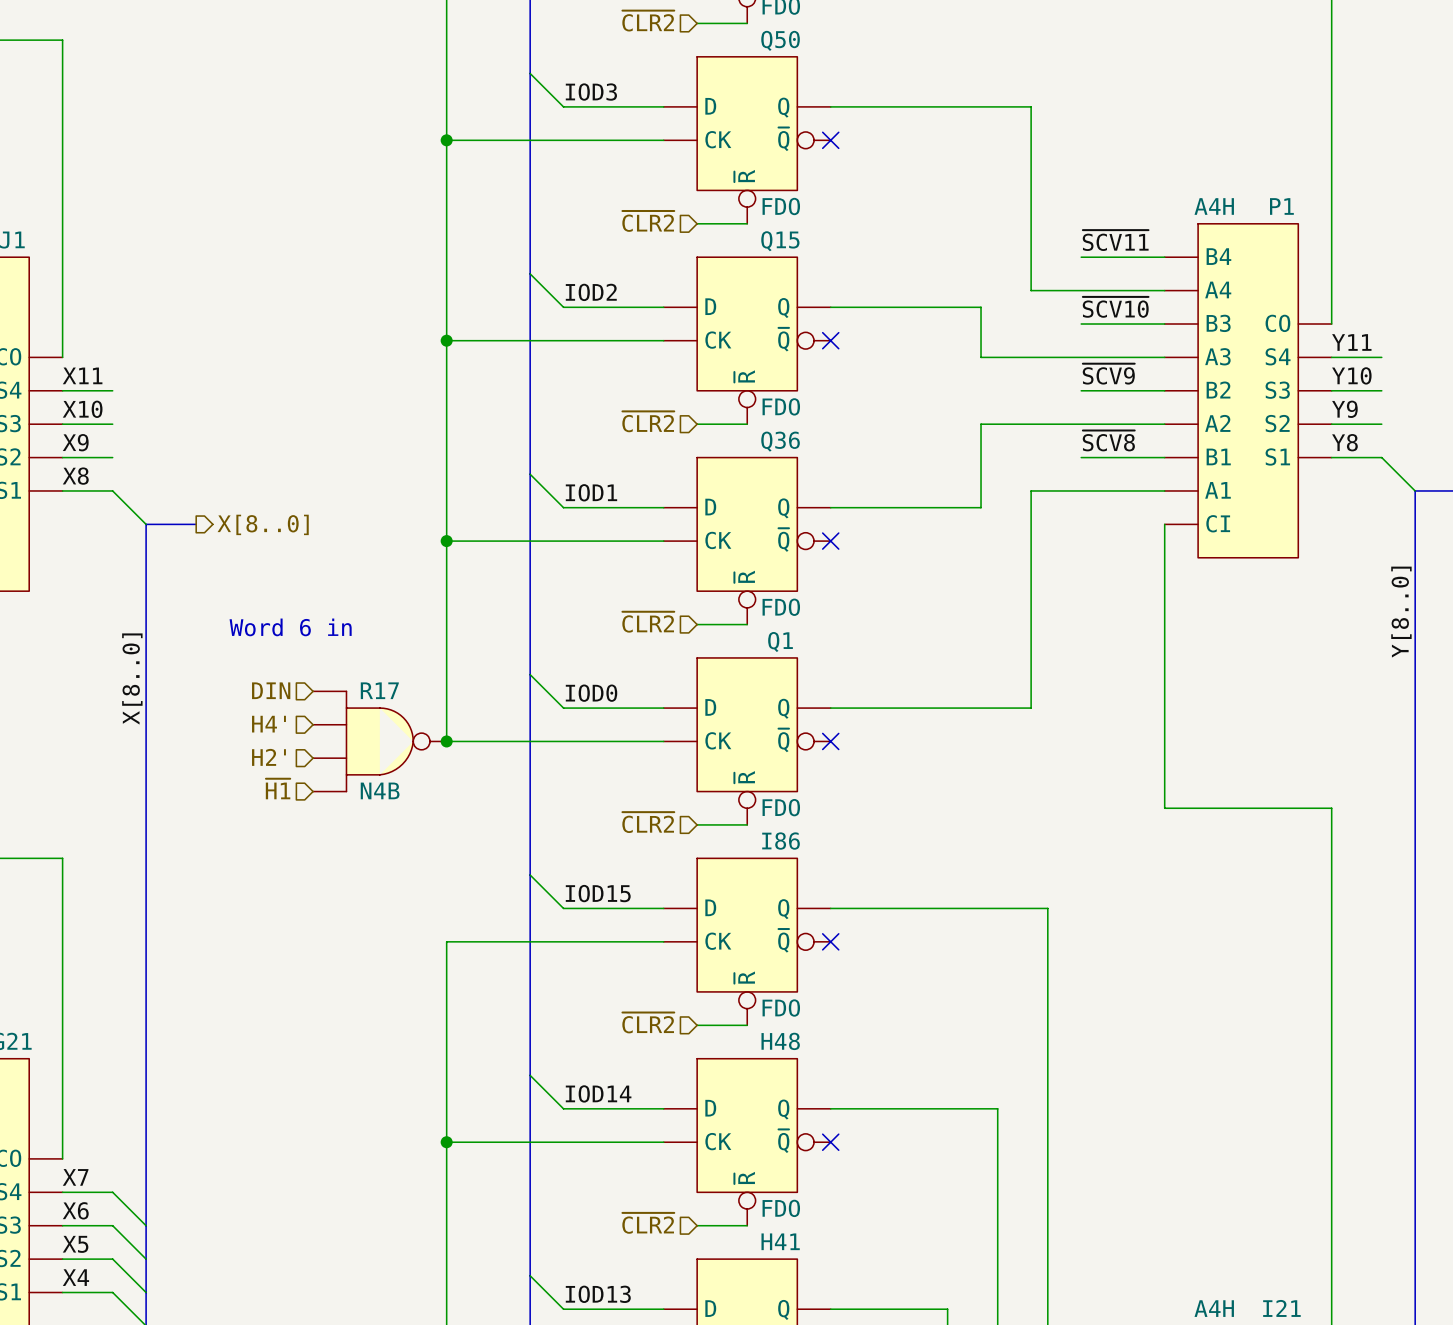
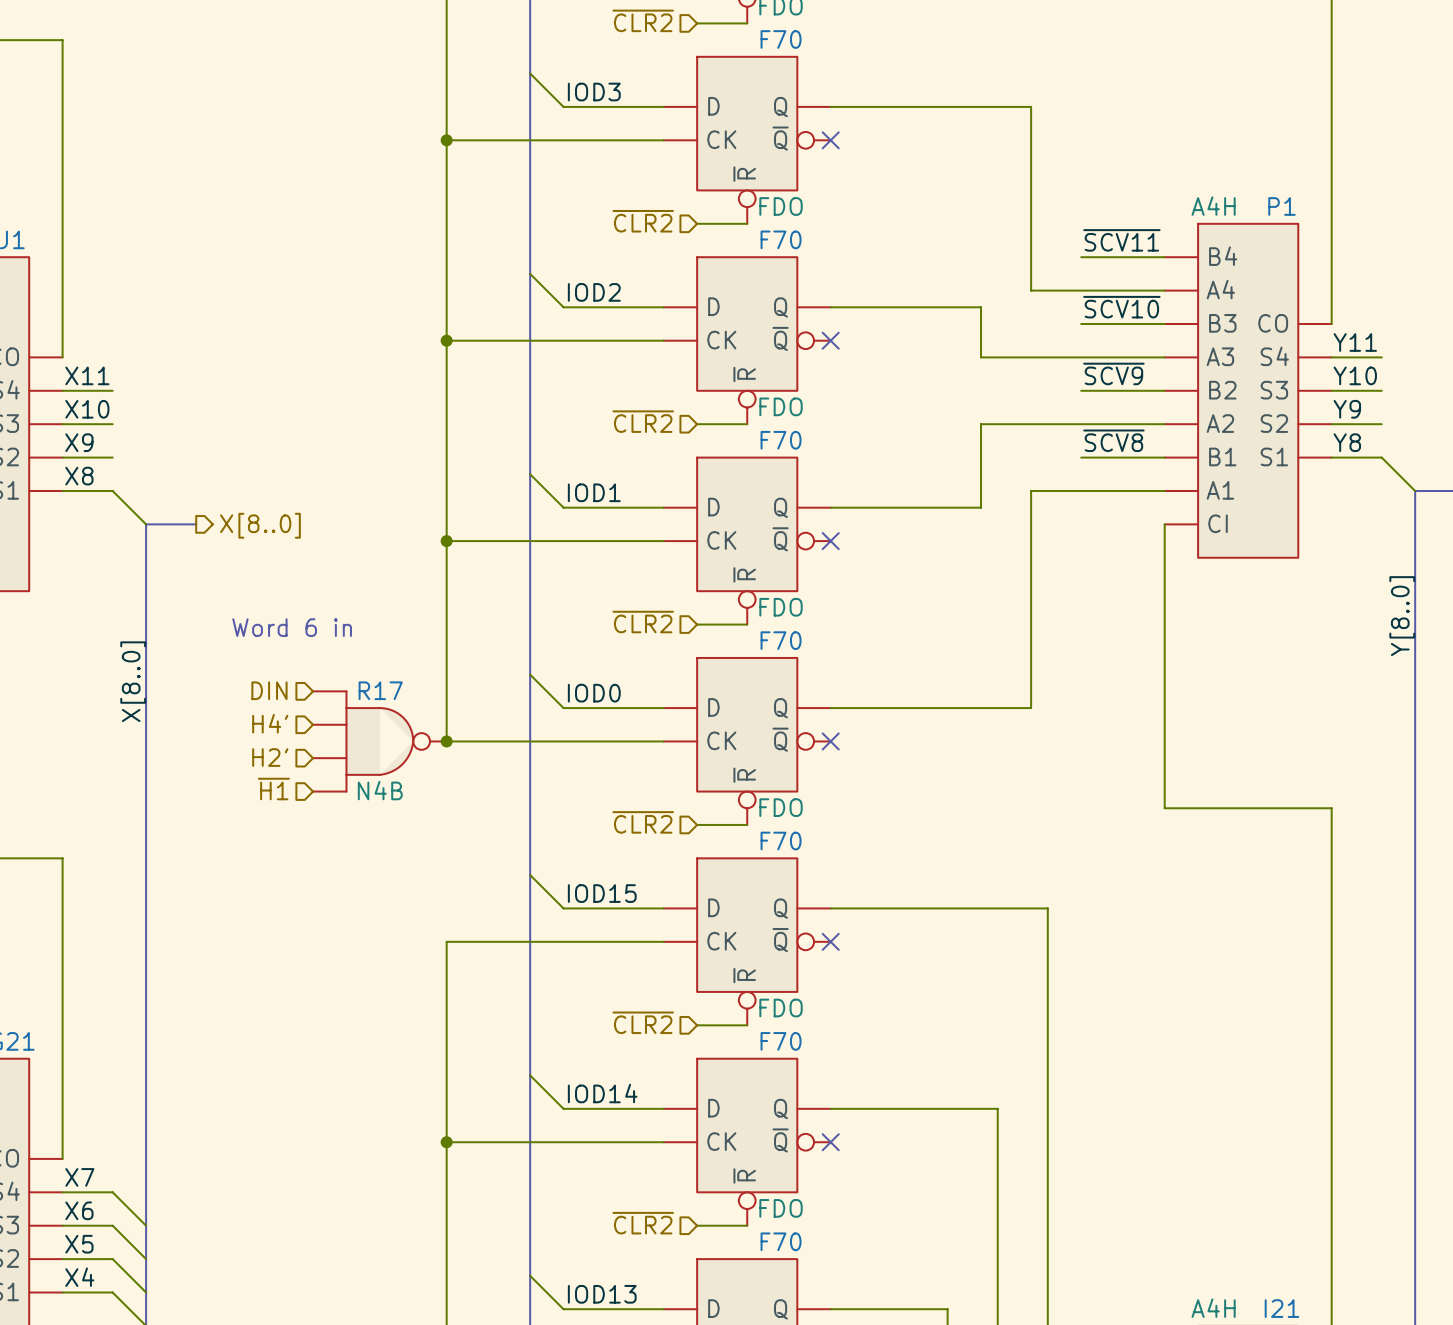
Q50 name: Q50 (780, 40) -> F70 (781, 39)
Q15 name: Q15 (780, 241) -> F70 (781, 239)
Q36 name: Q36 (780, 441) -> F70 (781, 440)
Q1 name: Q1 (780, 642) -> F70 (781, 640)
I86 name: I86 (781, 841) -> F70 (781, 841)
H48 name: H48 (780, 1041) -> F70 (781, 1041)
H41 name: H41 (780, 1241) -> F70 (781, 1241)

